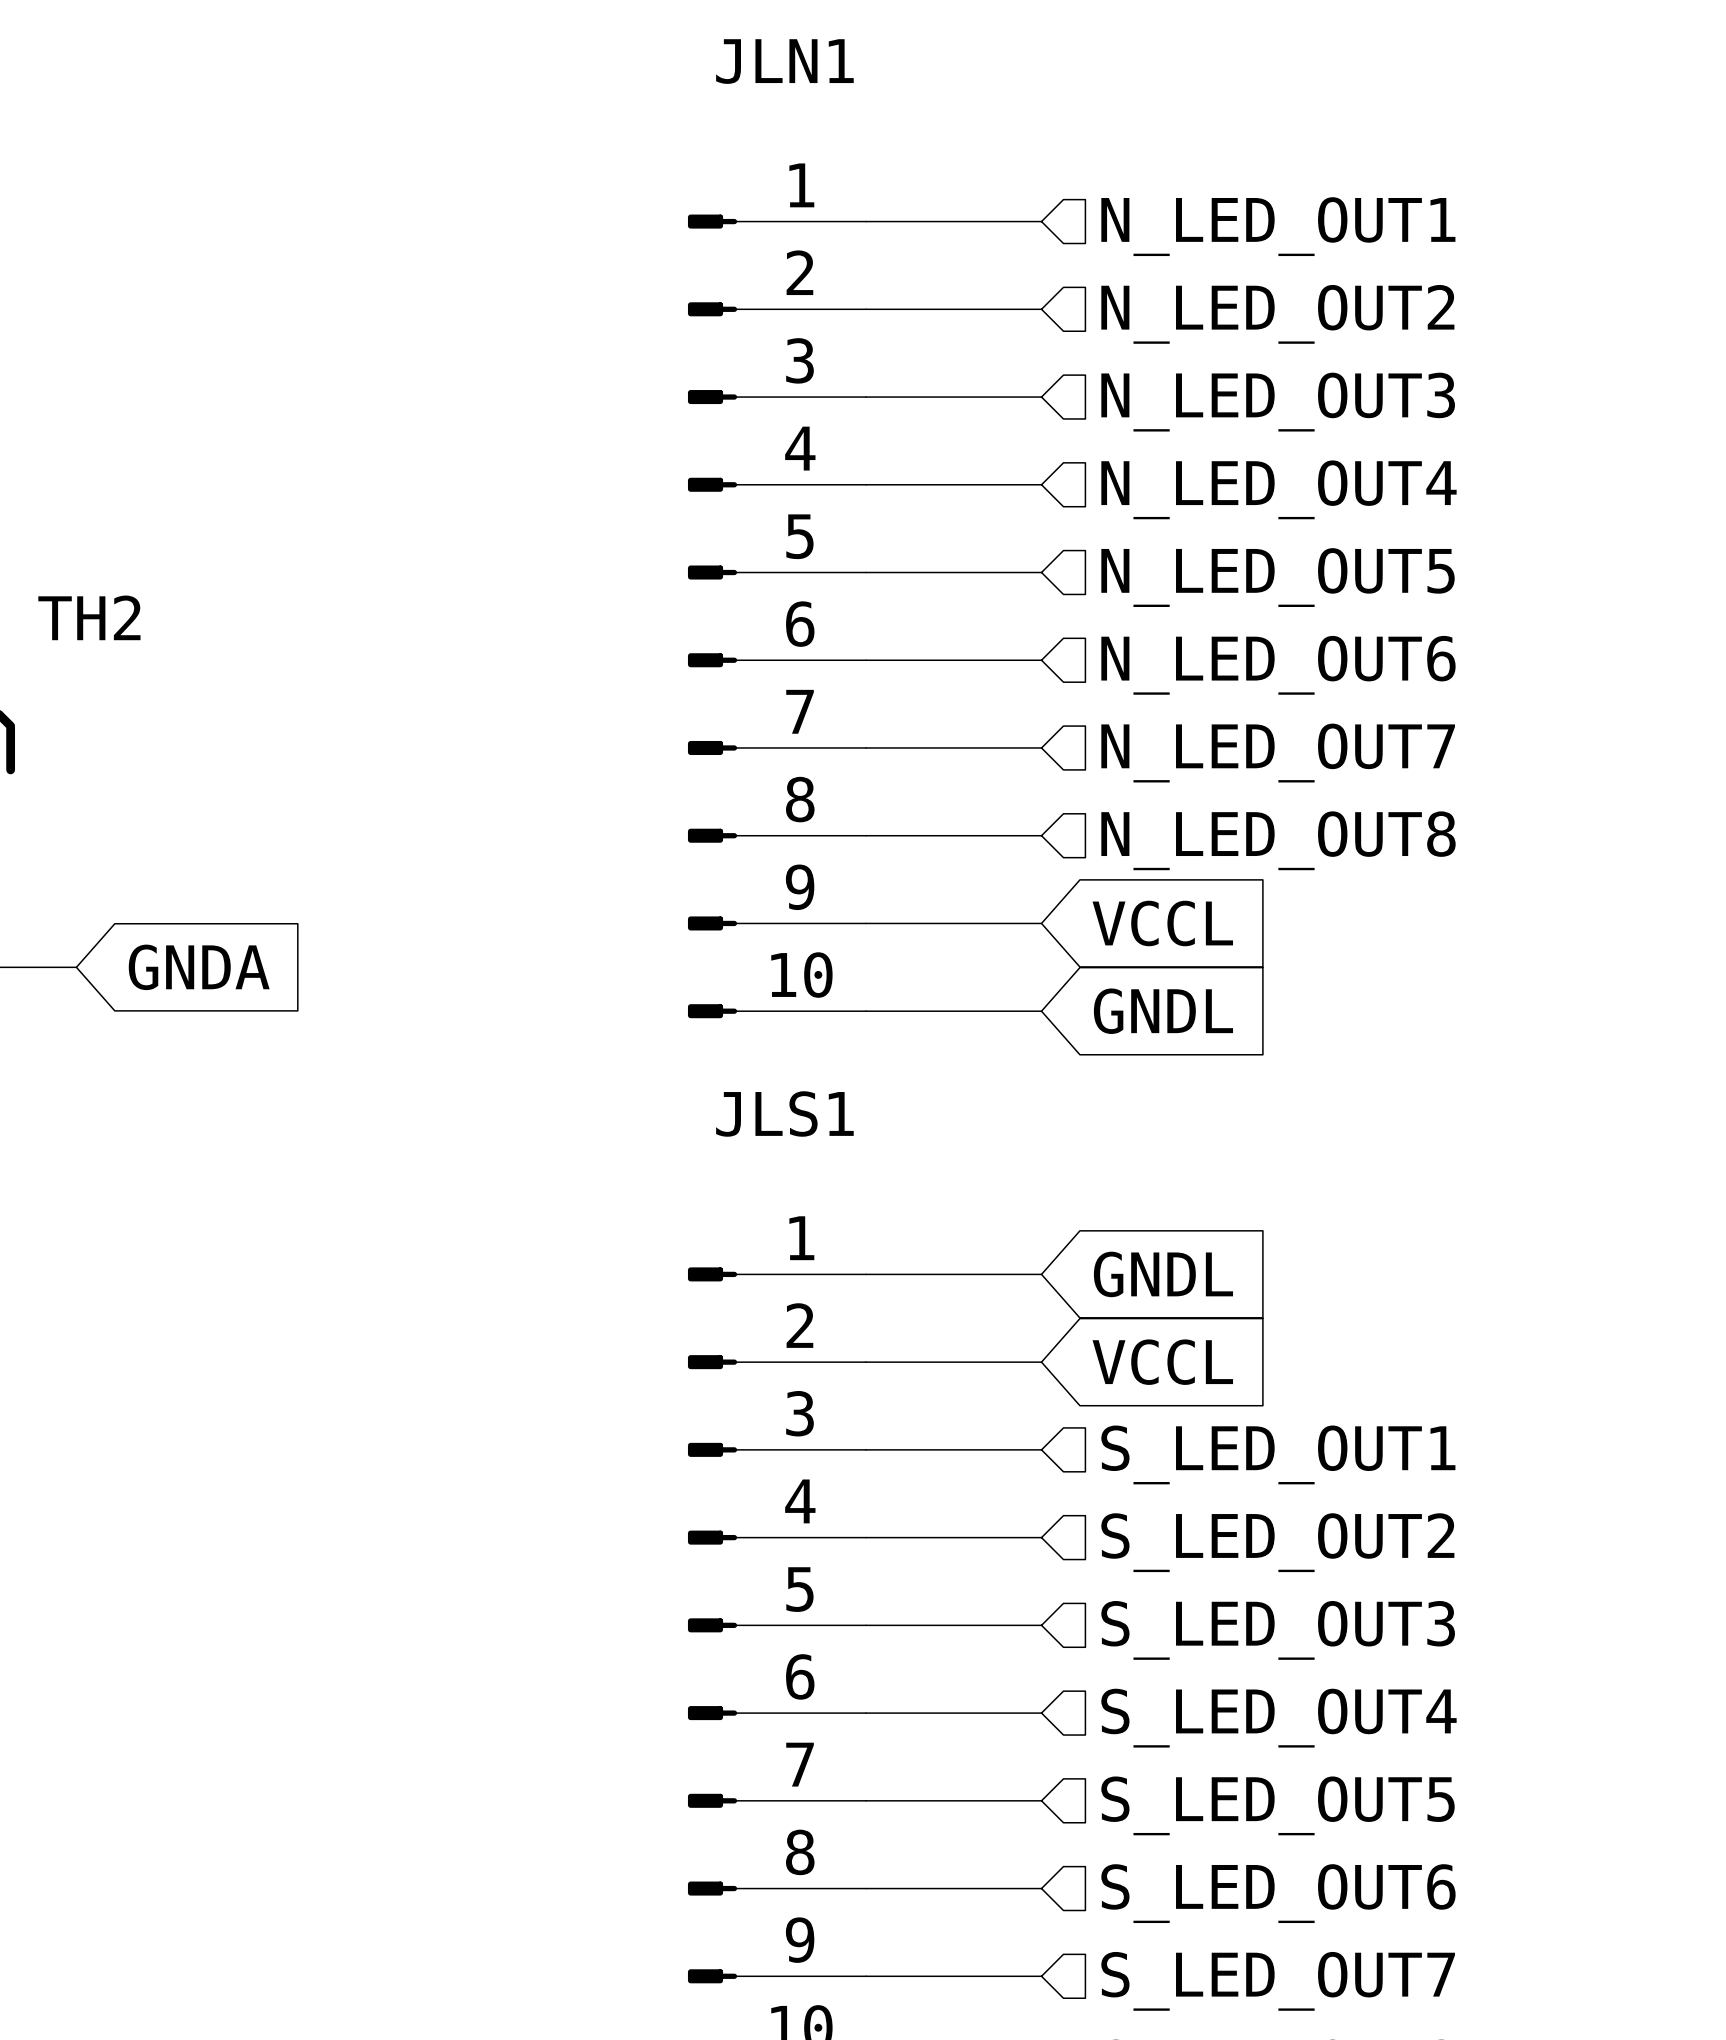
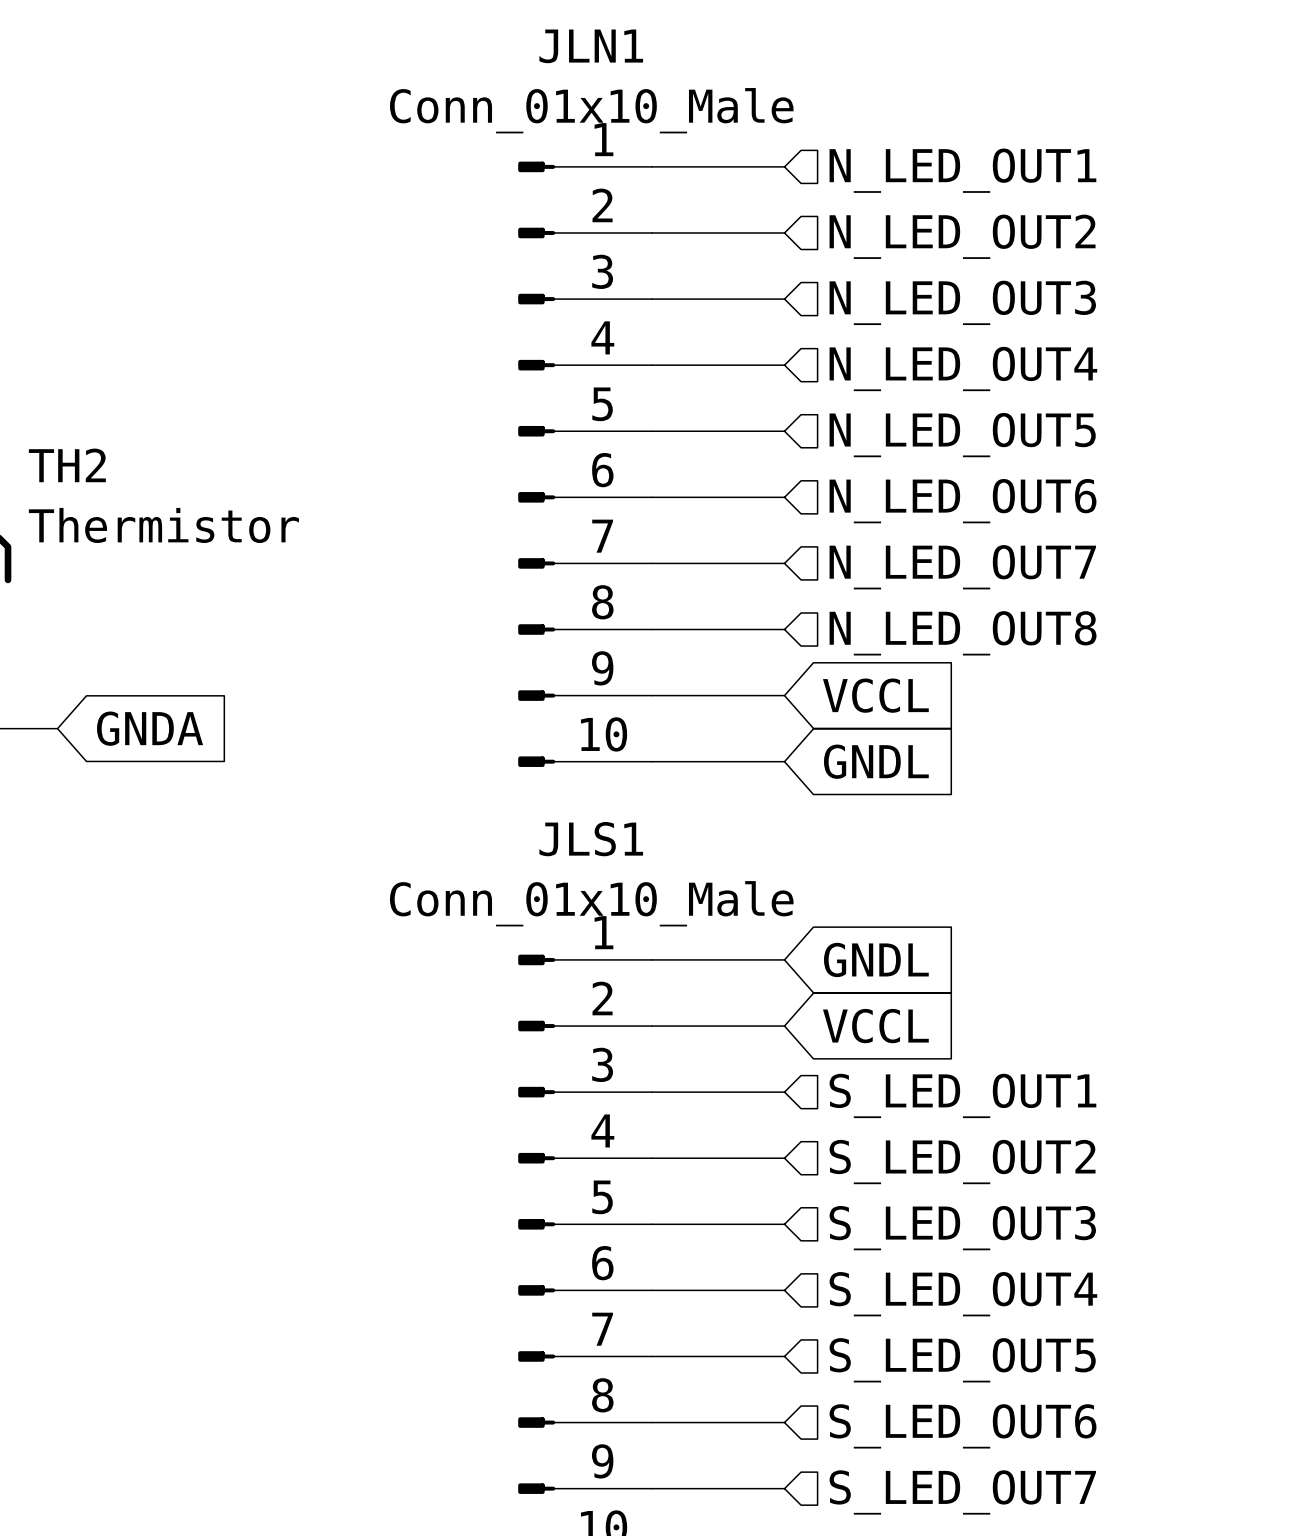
JLN1 value: none -> Conn_01x10_Male (591, 110)
TH2 value: none -> Thermistor (163, 525)
JLS1 value: none -> Conn_01x10_Male (591, 903)

